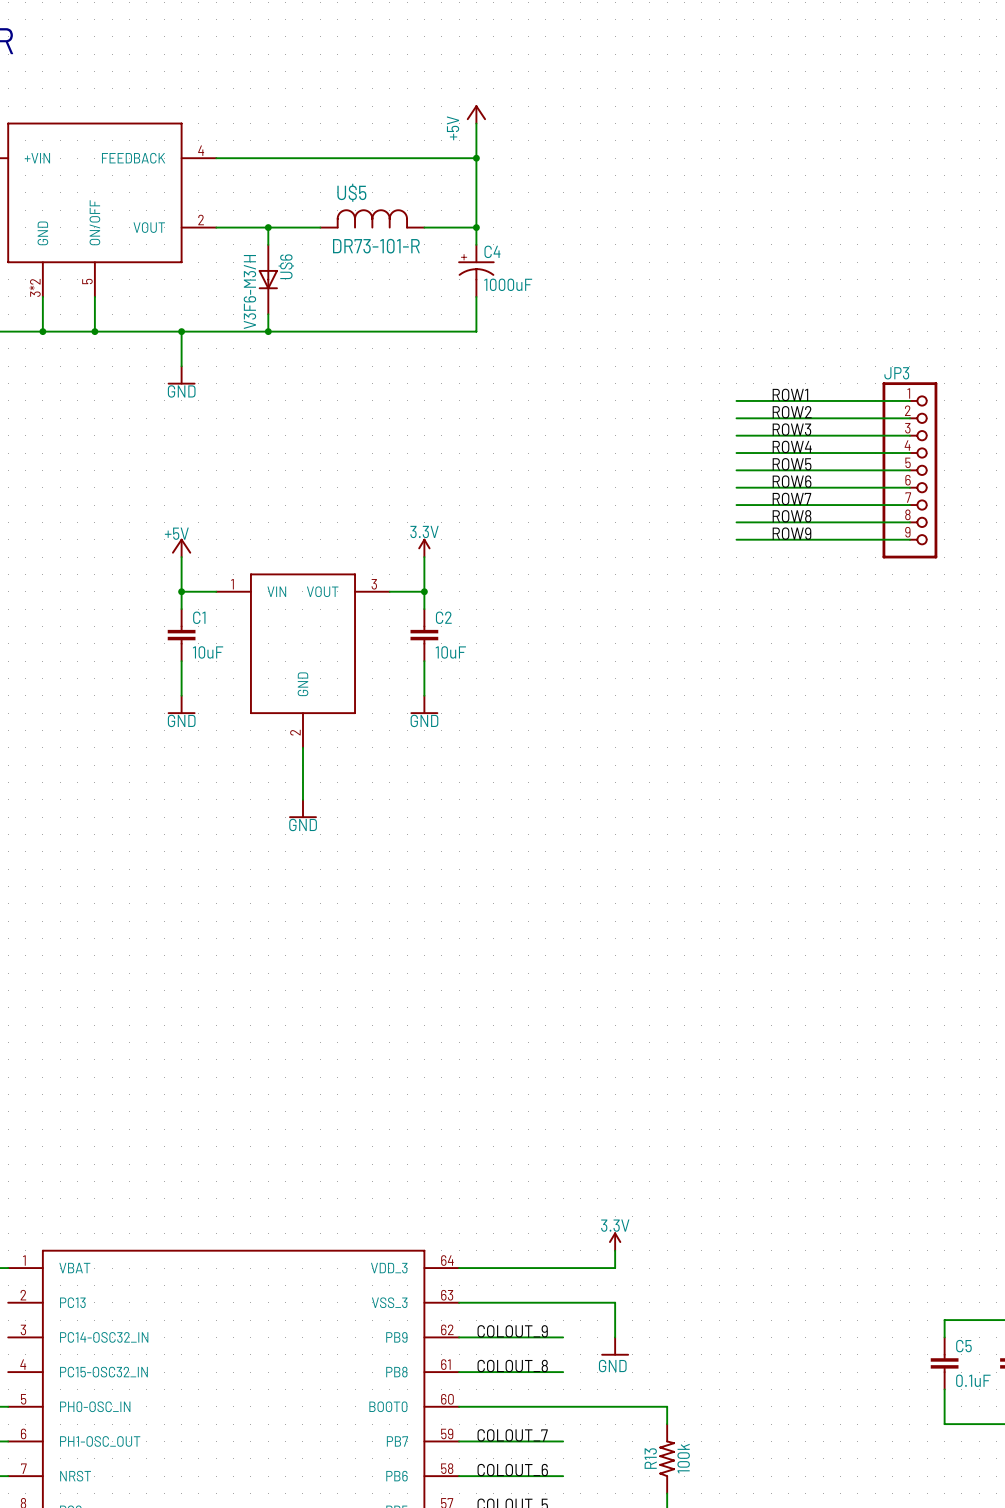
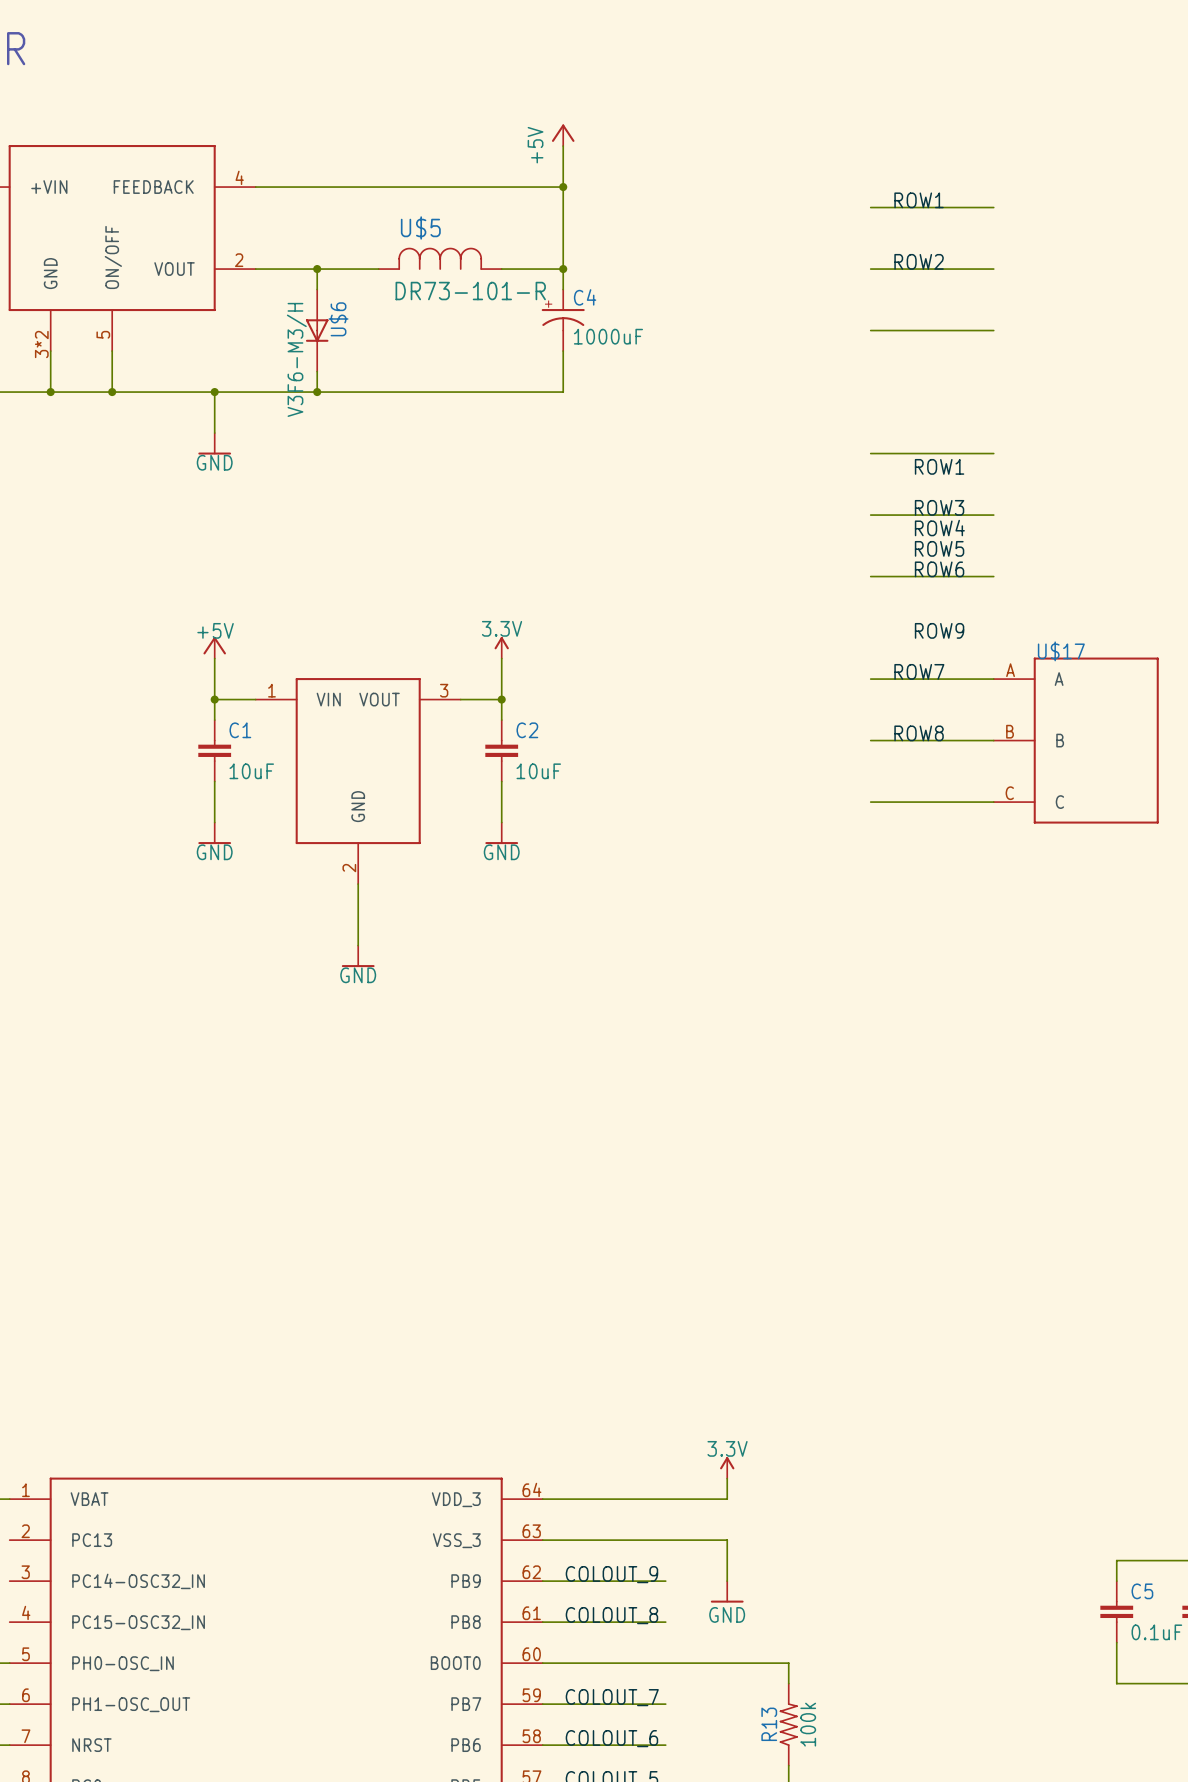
label: none -> ROW1 (919, 200)
wire: none -> (870, 207) (993, 207)
label: none -> ROW2 (919, 261)
wire: none -> (870, 269) (993, 269)
wire: none -> (870, 330) (993, 330)
wire: none -> (870, 453) (993, 453)
wire: (736, 400) (909, 400) -> none
label: ROW2 (792, 412) -> none
wire: (736, 418) (909, 418) -> none
wire: (840, 435) (909, 435) -> none
wire: (736, 453) (909, 453) -> none
wire: (736, 470) (909, 470) -> none
JP3: (909, 470) -> none
wire: (840, 487) (909, 487) -> none
label position: ROW7 (791, 498) -> ROW7 (919, 671)
wire: (736, 505) (909, 505) -> none
label position: ROW8 (792, 516) -> ROW8 (919, 733)
wire: (736, 522) (909, 522) -> none
wire: (736, 539) (909, 539) -> none
wire: none -> (870, 679) (993, 679)
wire: none -> (870, 740) (993, 740)
U$17: none -> (1076, 740)
wire: none -> (870, 802) (993, 802)

